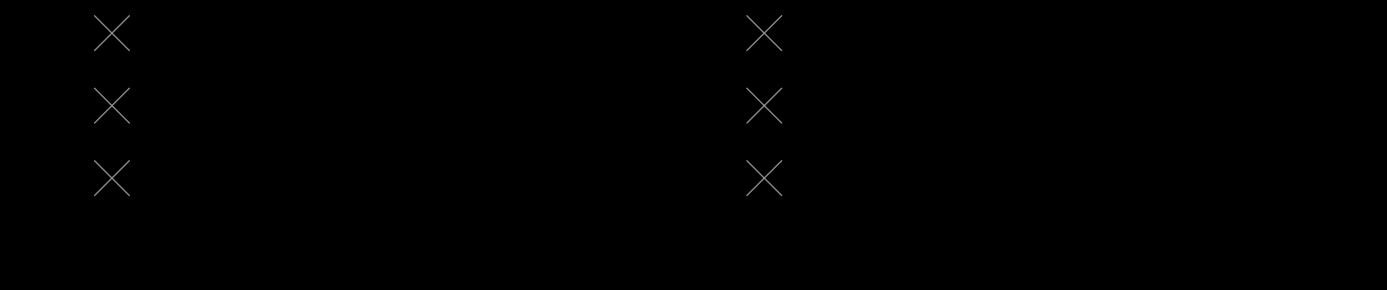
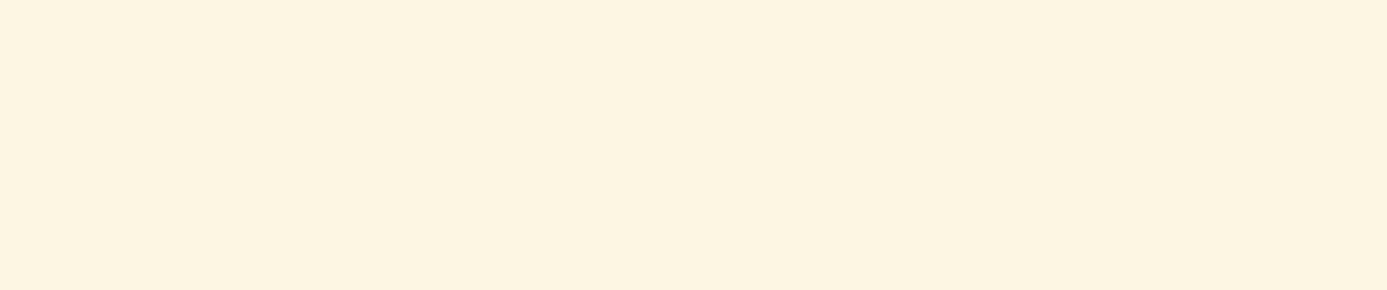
no-connect mark: (111, 33) -> none
no-connect mark: (764, 33) -> none
no-connect mark: (111, 105) -> none
no-connect mark: (764, 105) -> none
no-connect mark: (111, 178) -> none
no-connect mark: (764, 178) -> none

